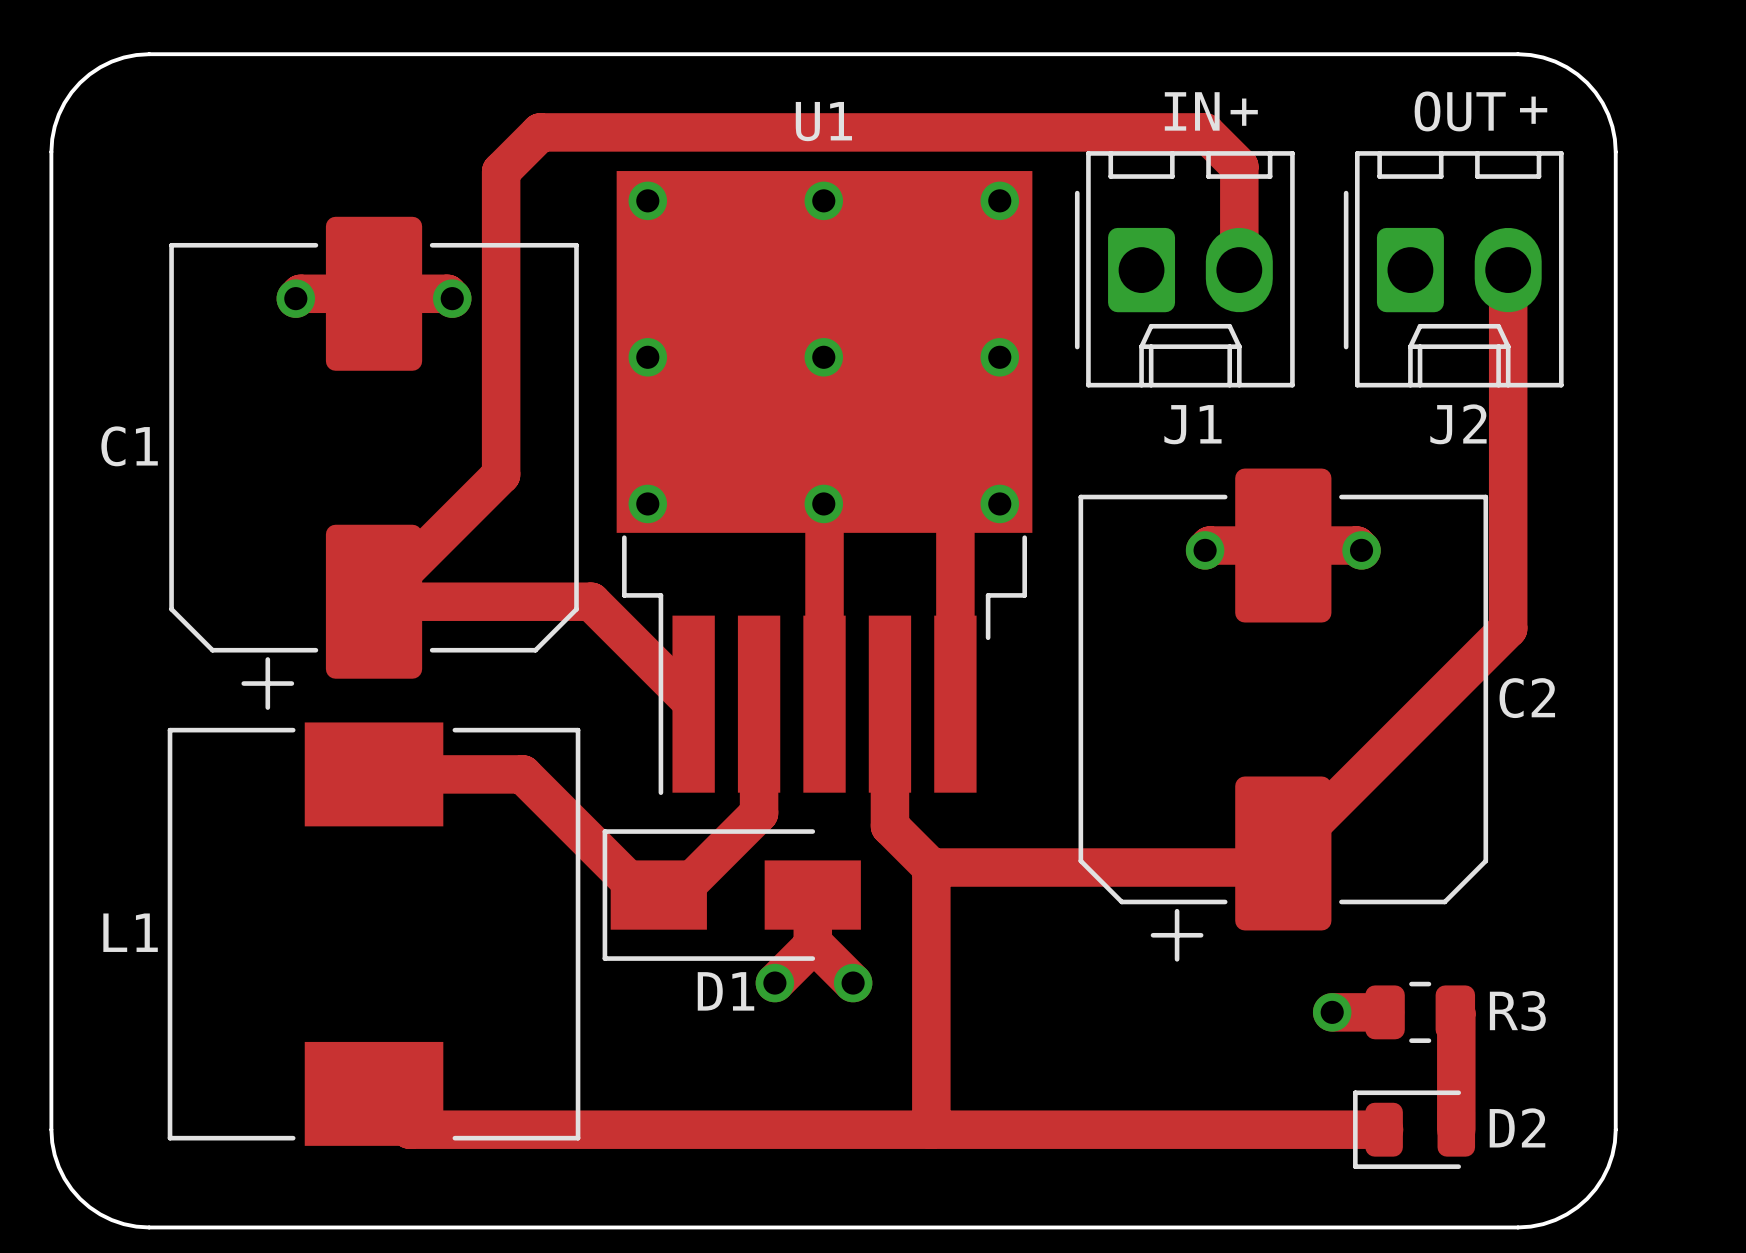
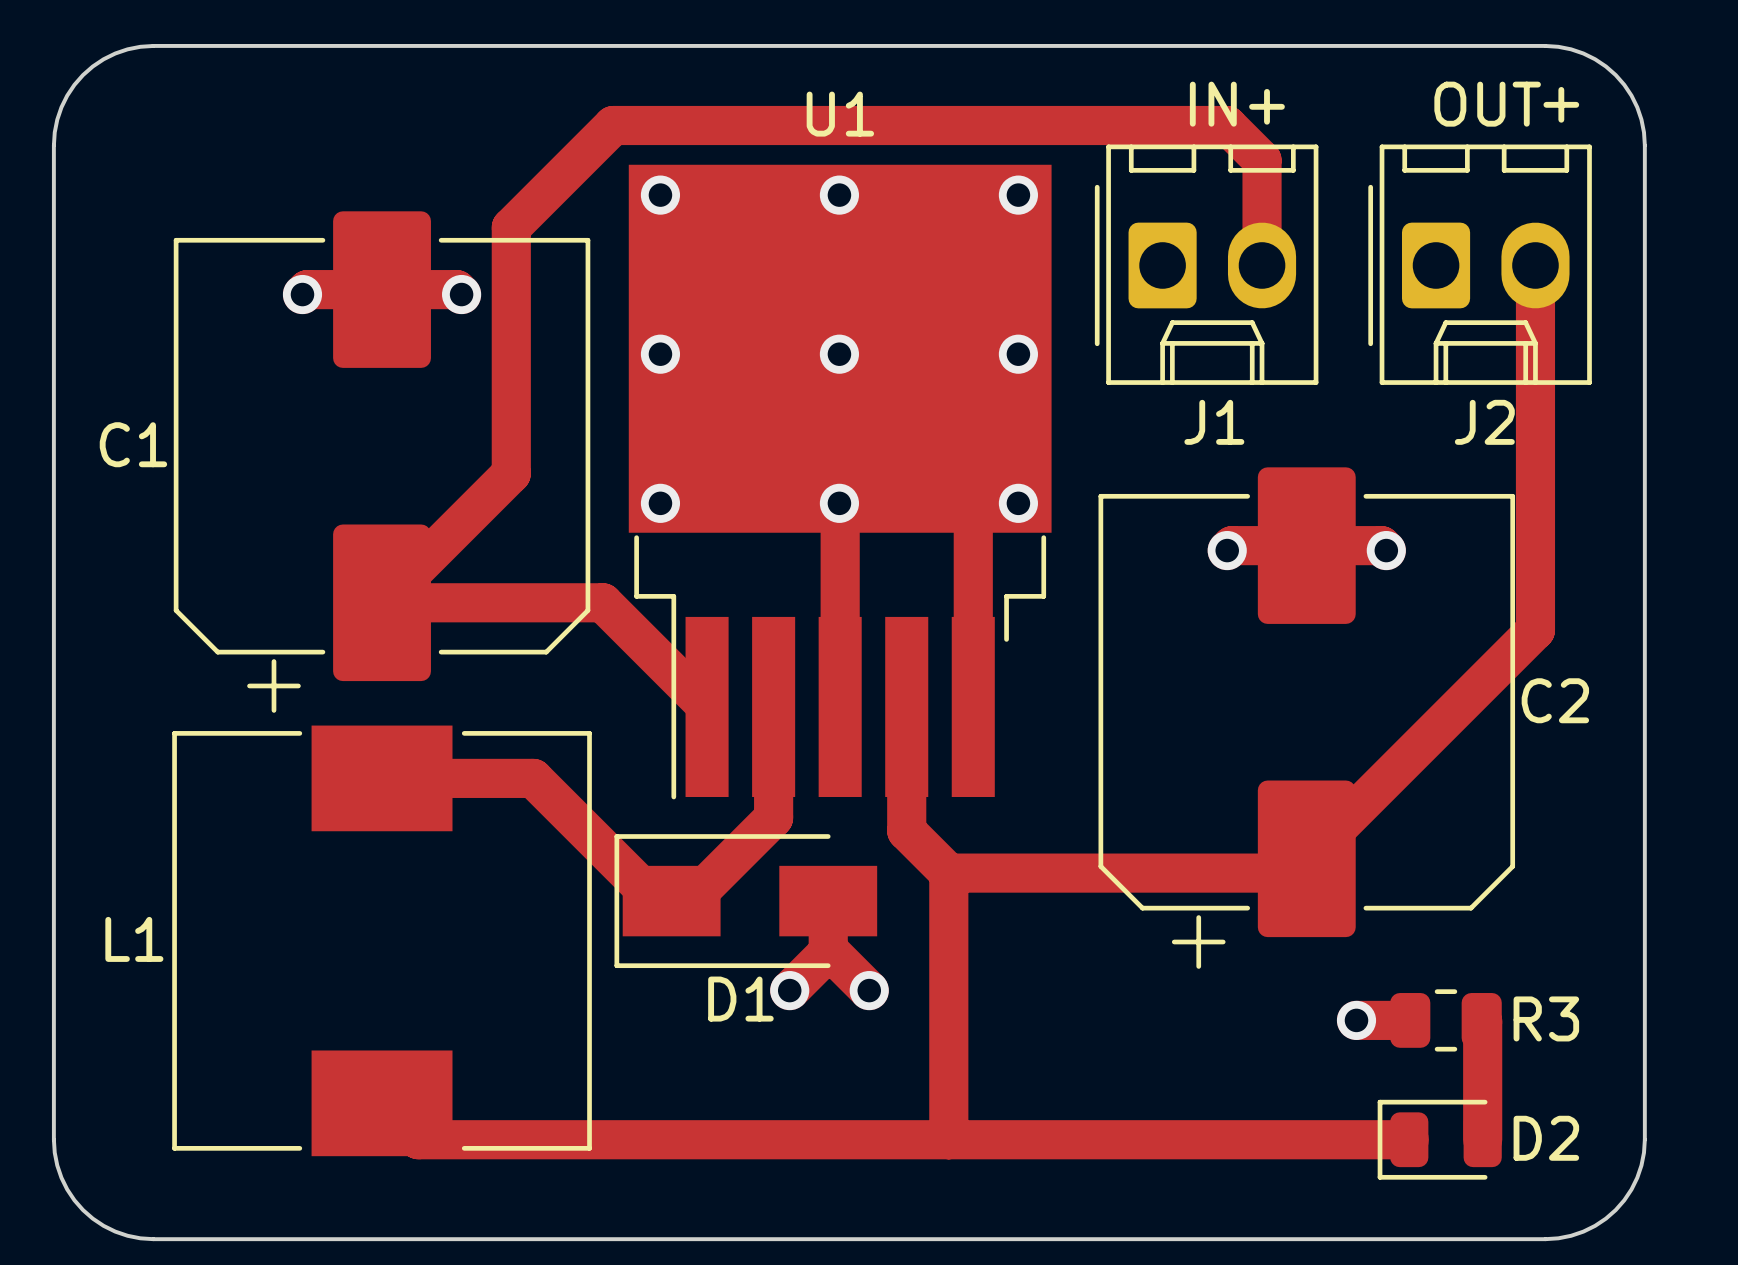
top track: (601, 132) (540, 132) (501, 171) (501, 232) -> (613, 125) (511, 227)

